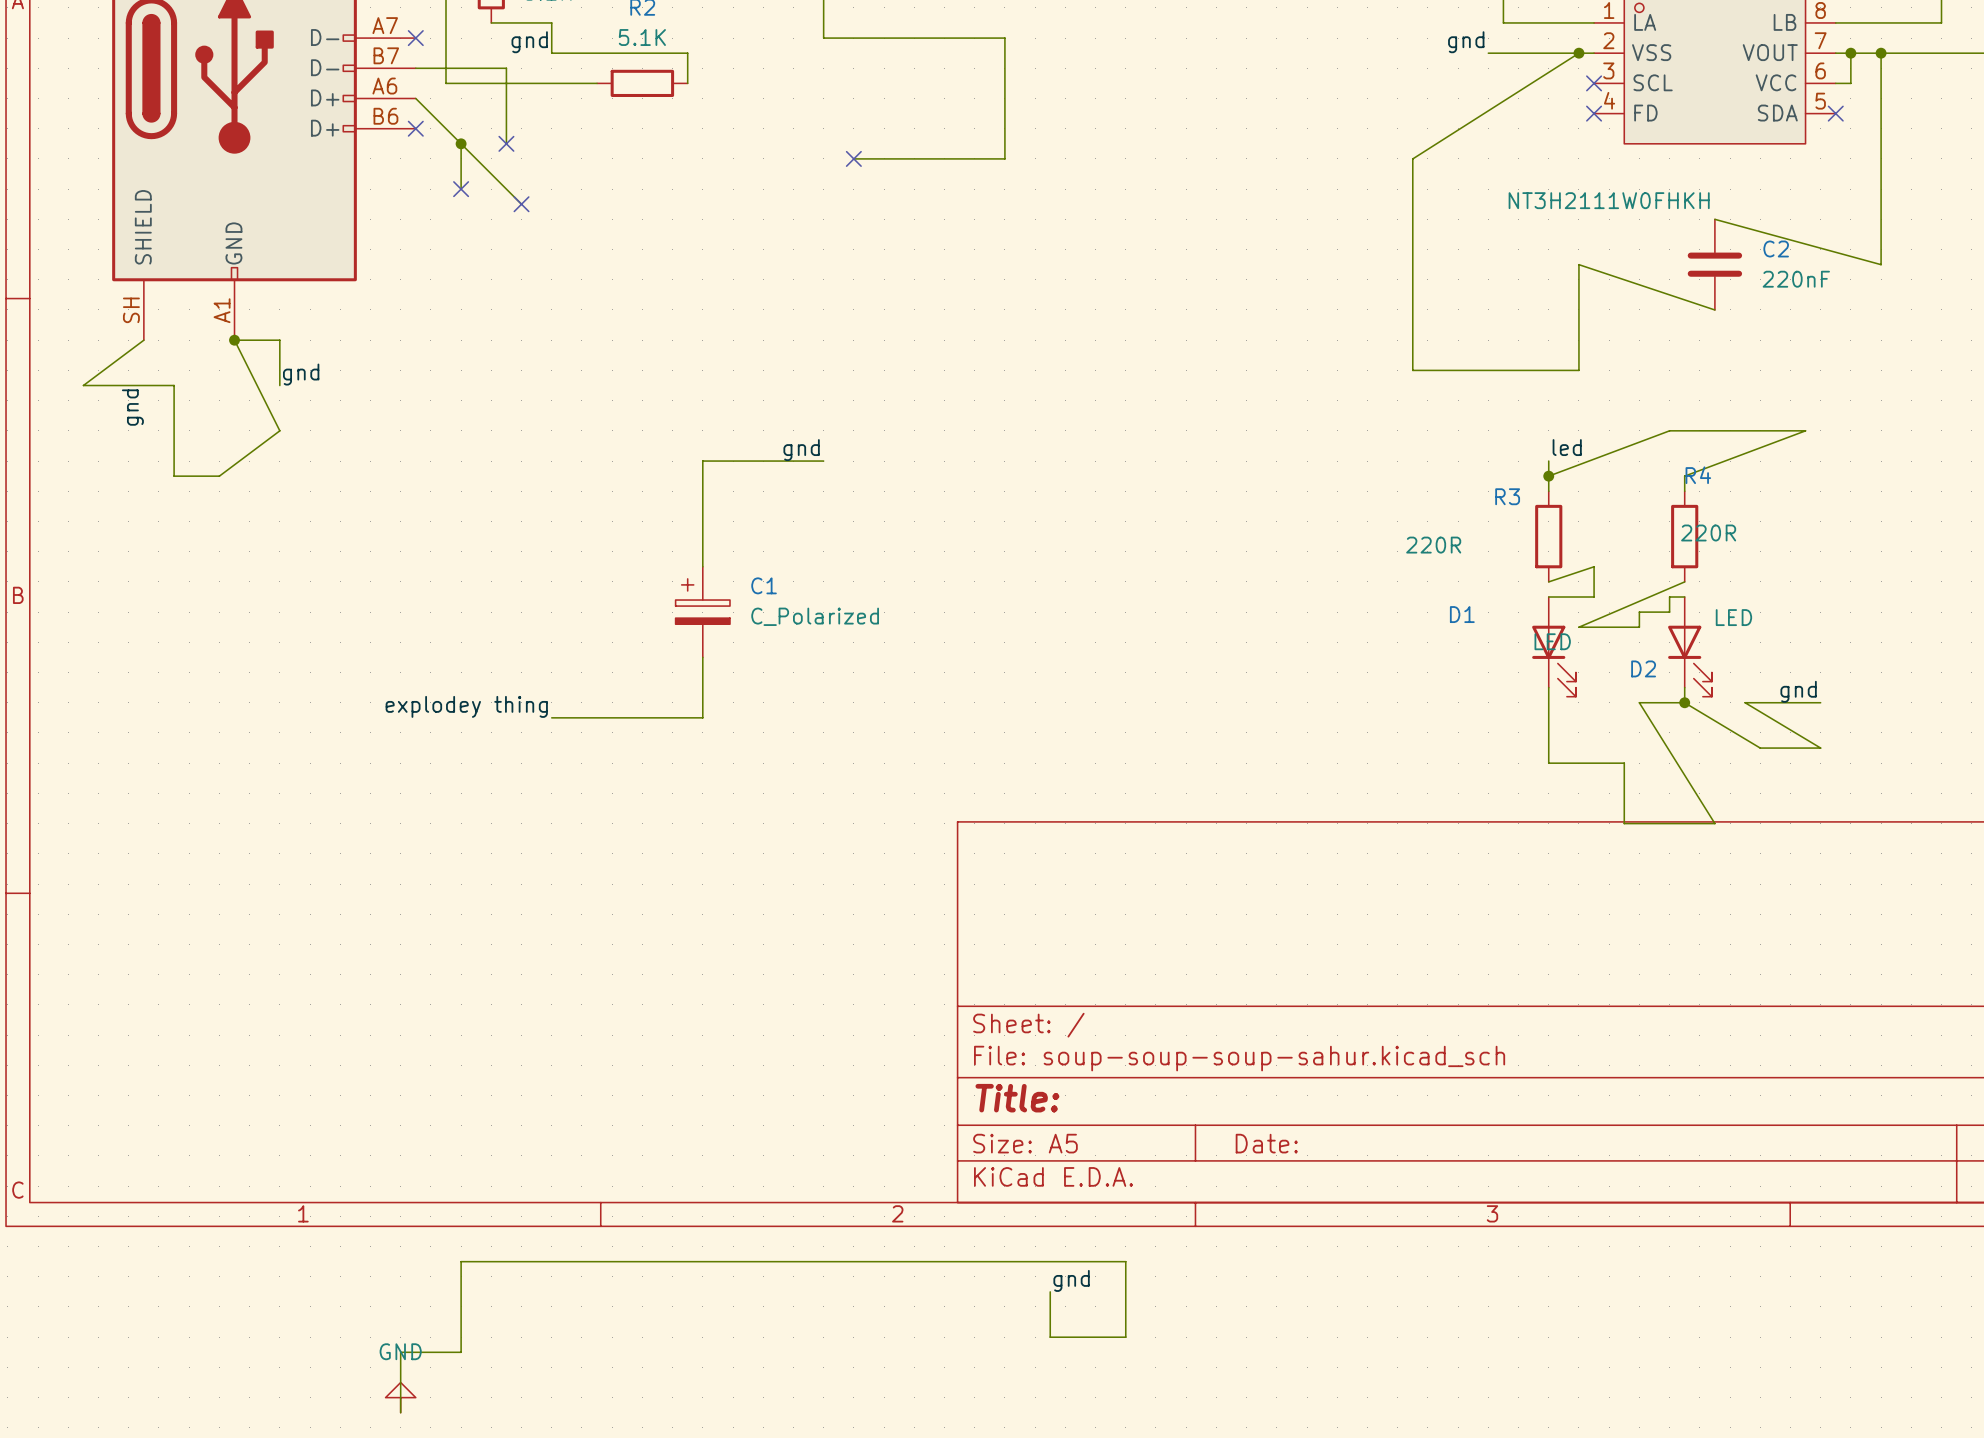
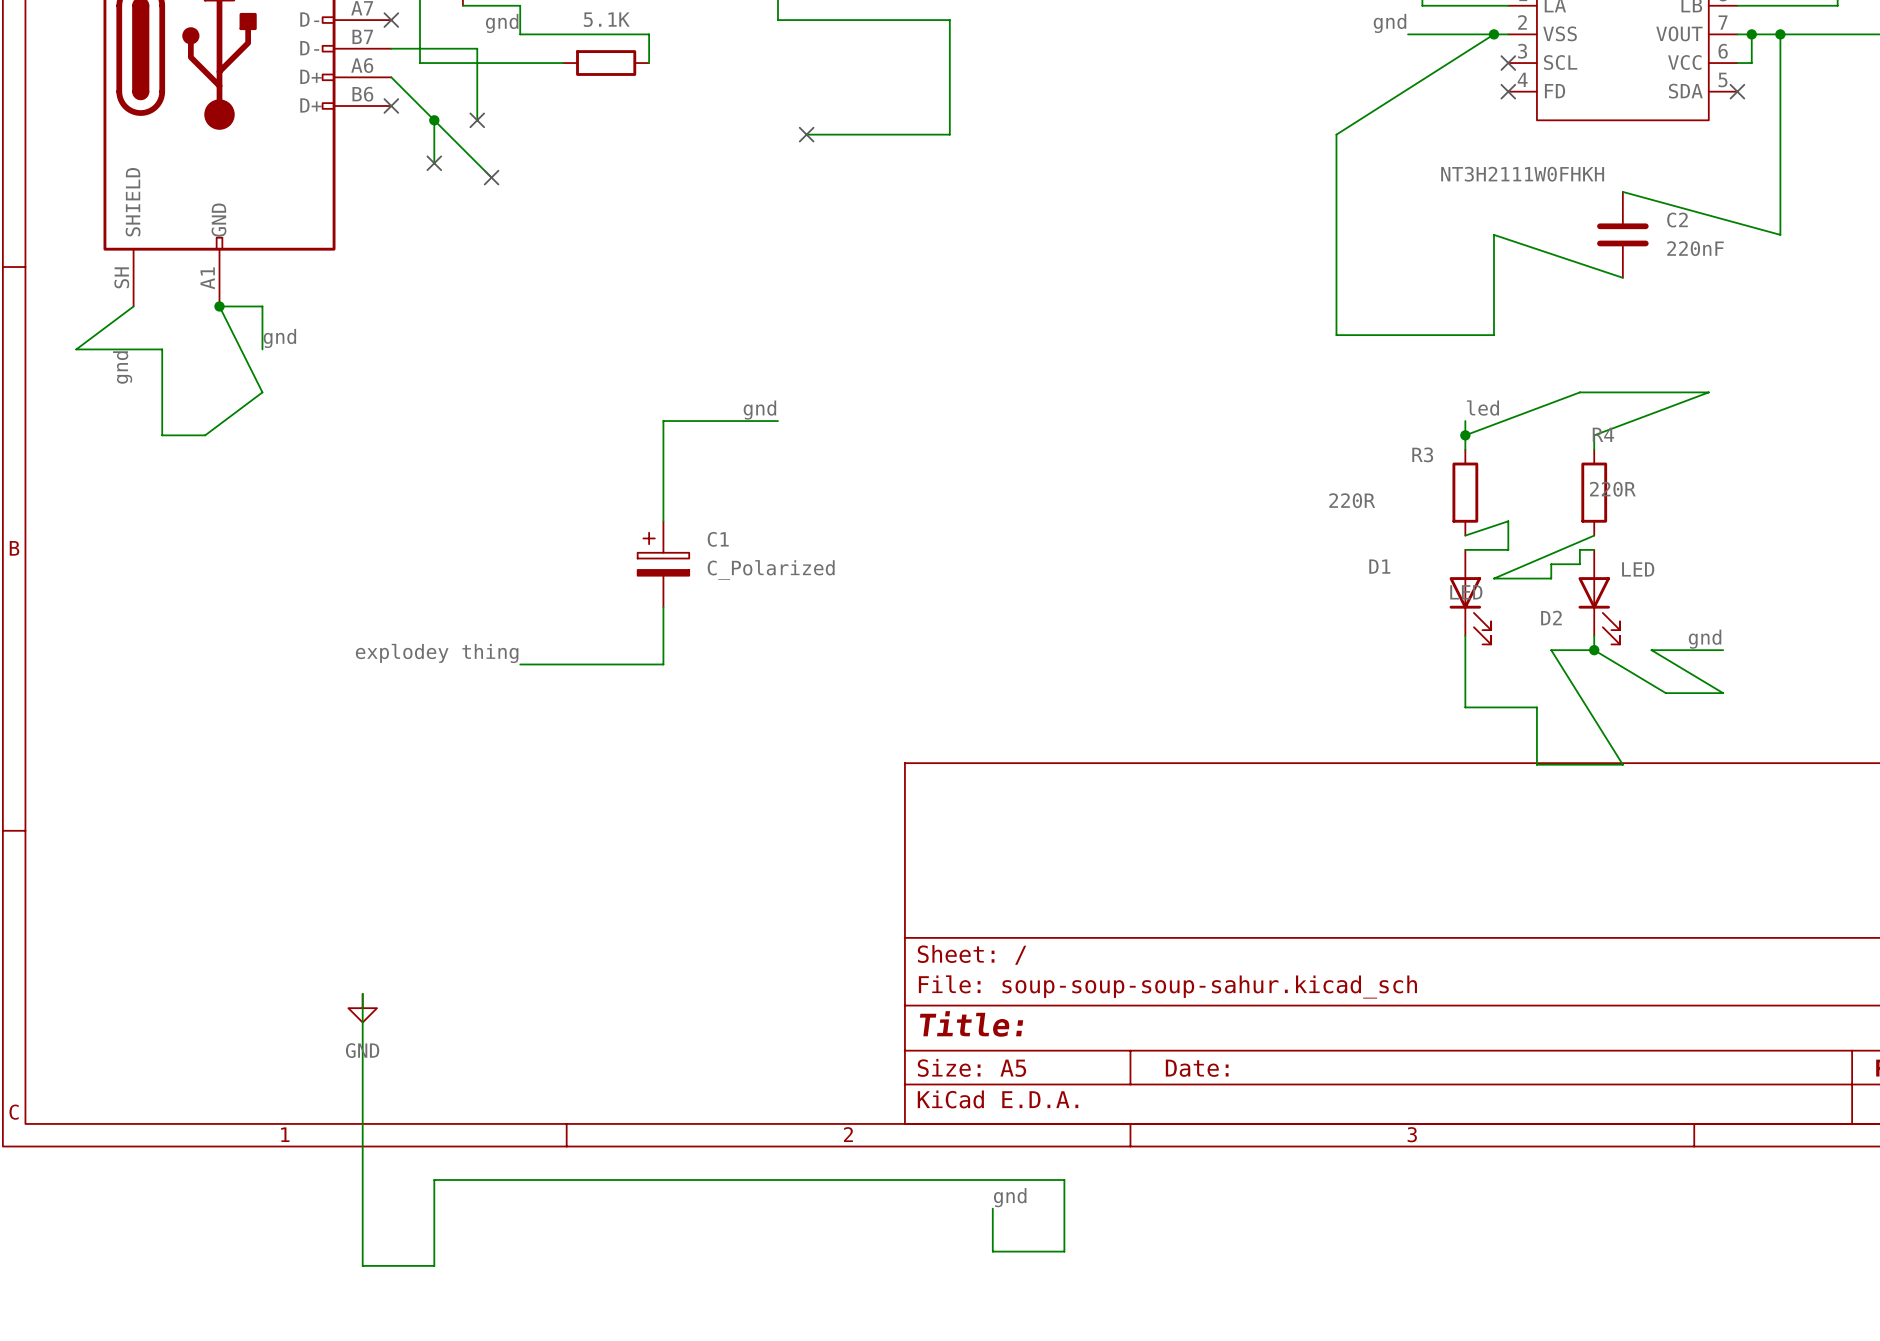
power symbol: none -> GND (362, 1008)
wire: (400, 1352) (400, 1412) -> (377, 1265) (362, 1265) (362, 993)
power symbol: GND (400, 1397) -> none

